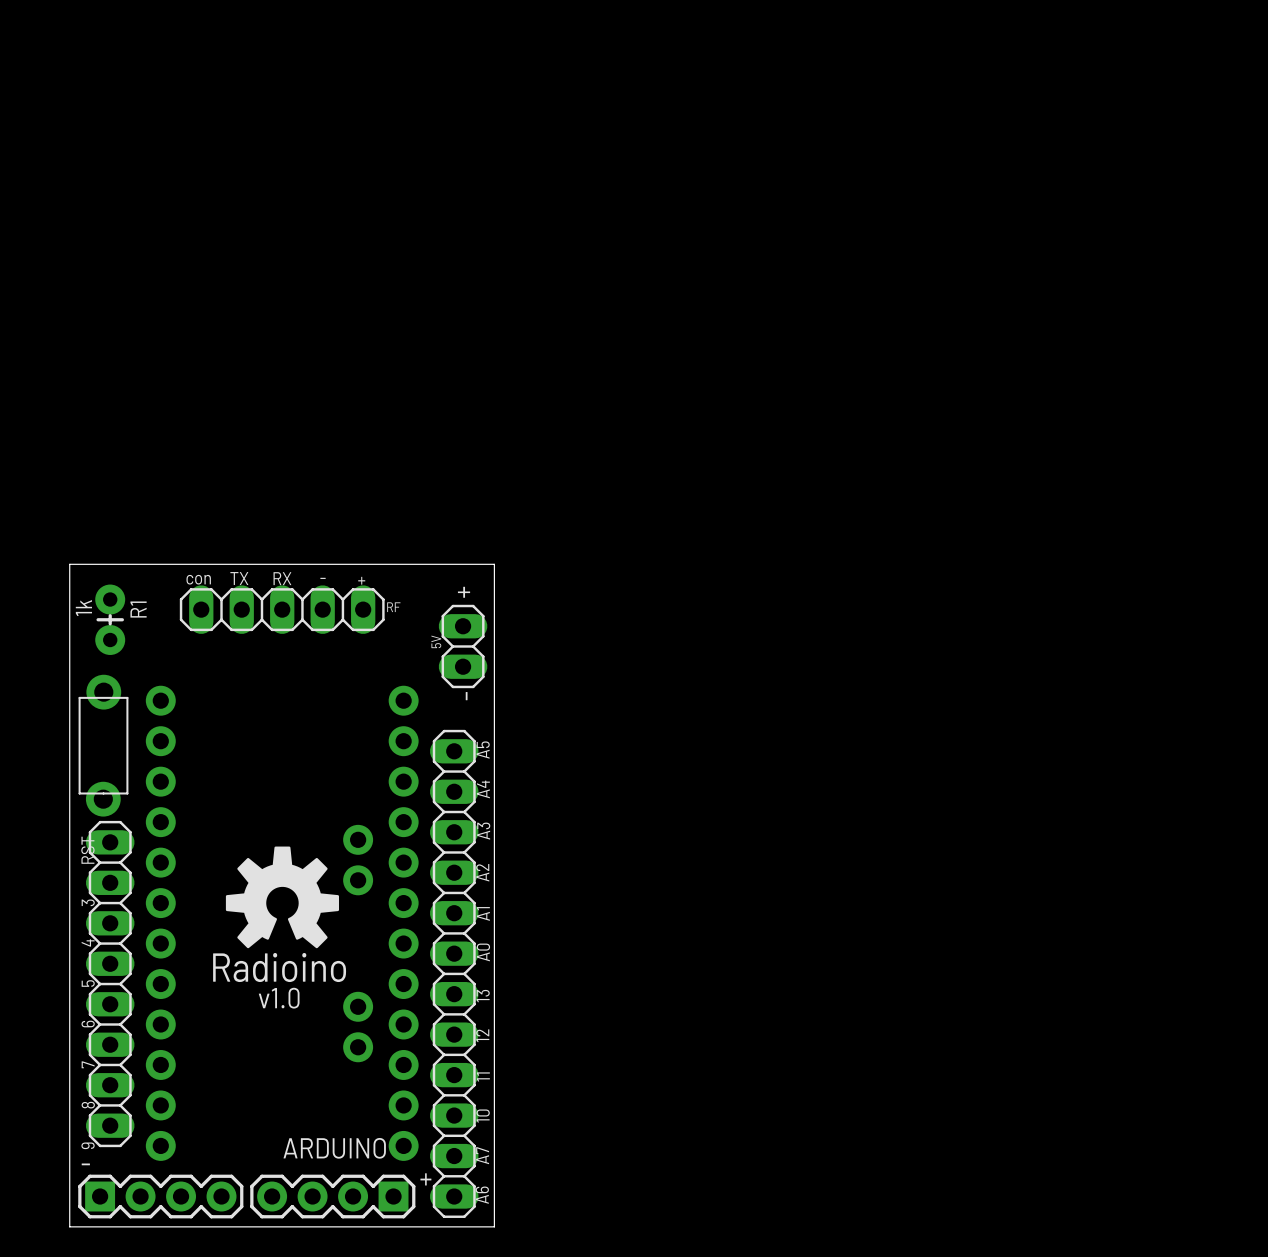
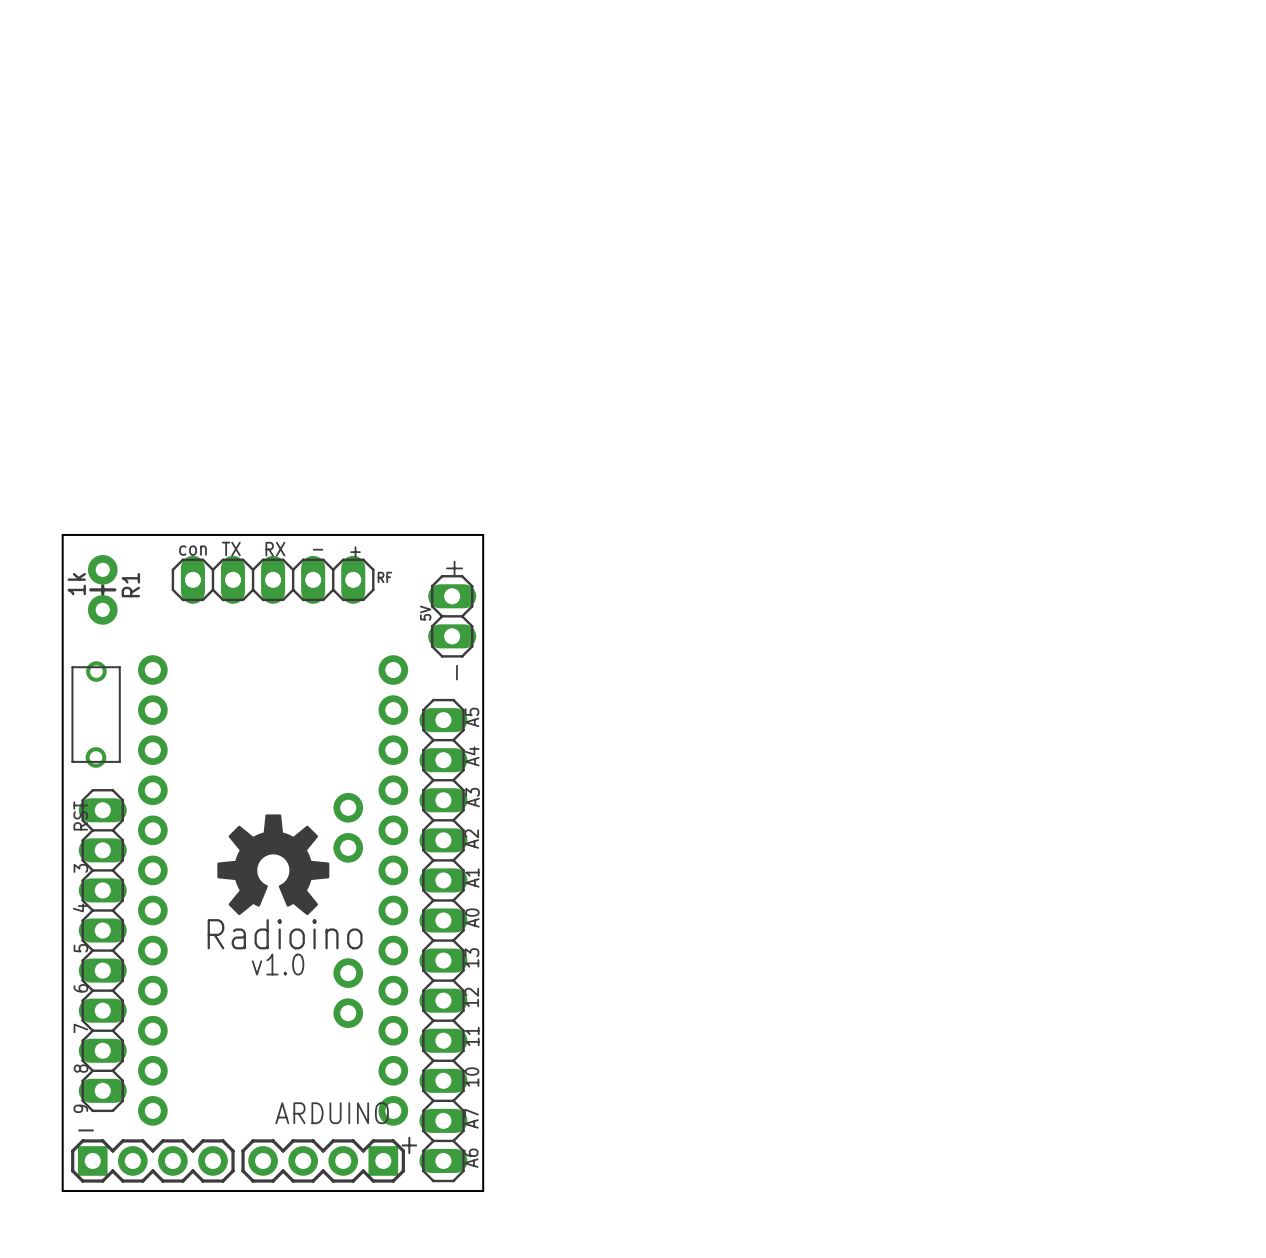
part footprint: [78, 674, 129, 817] -> [71, 661, 121, 768]

